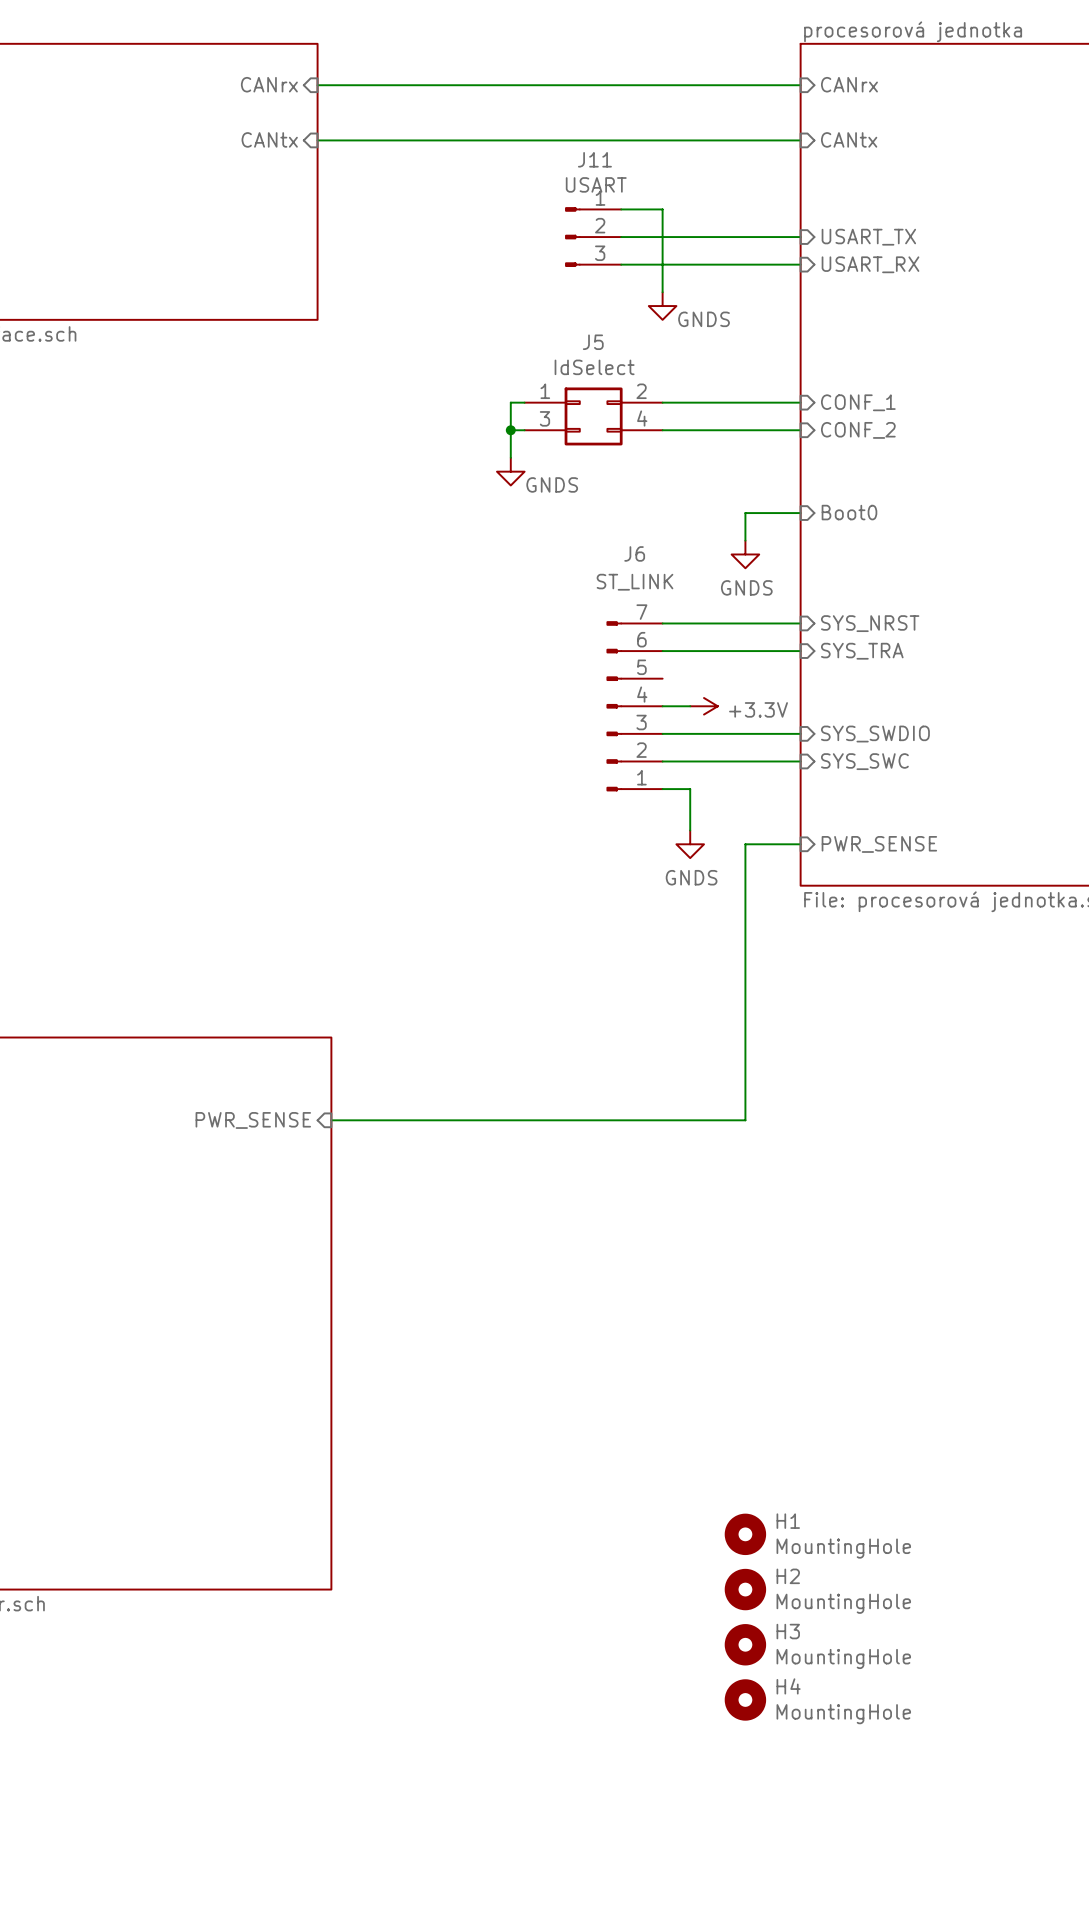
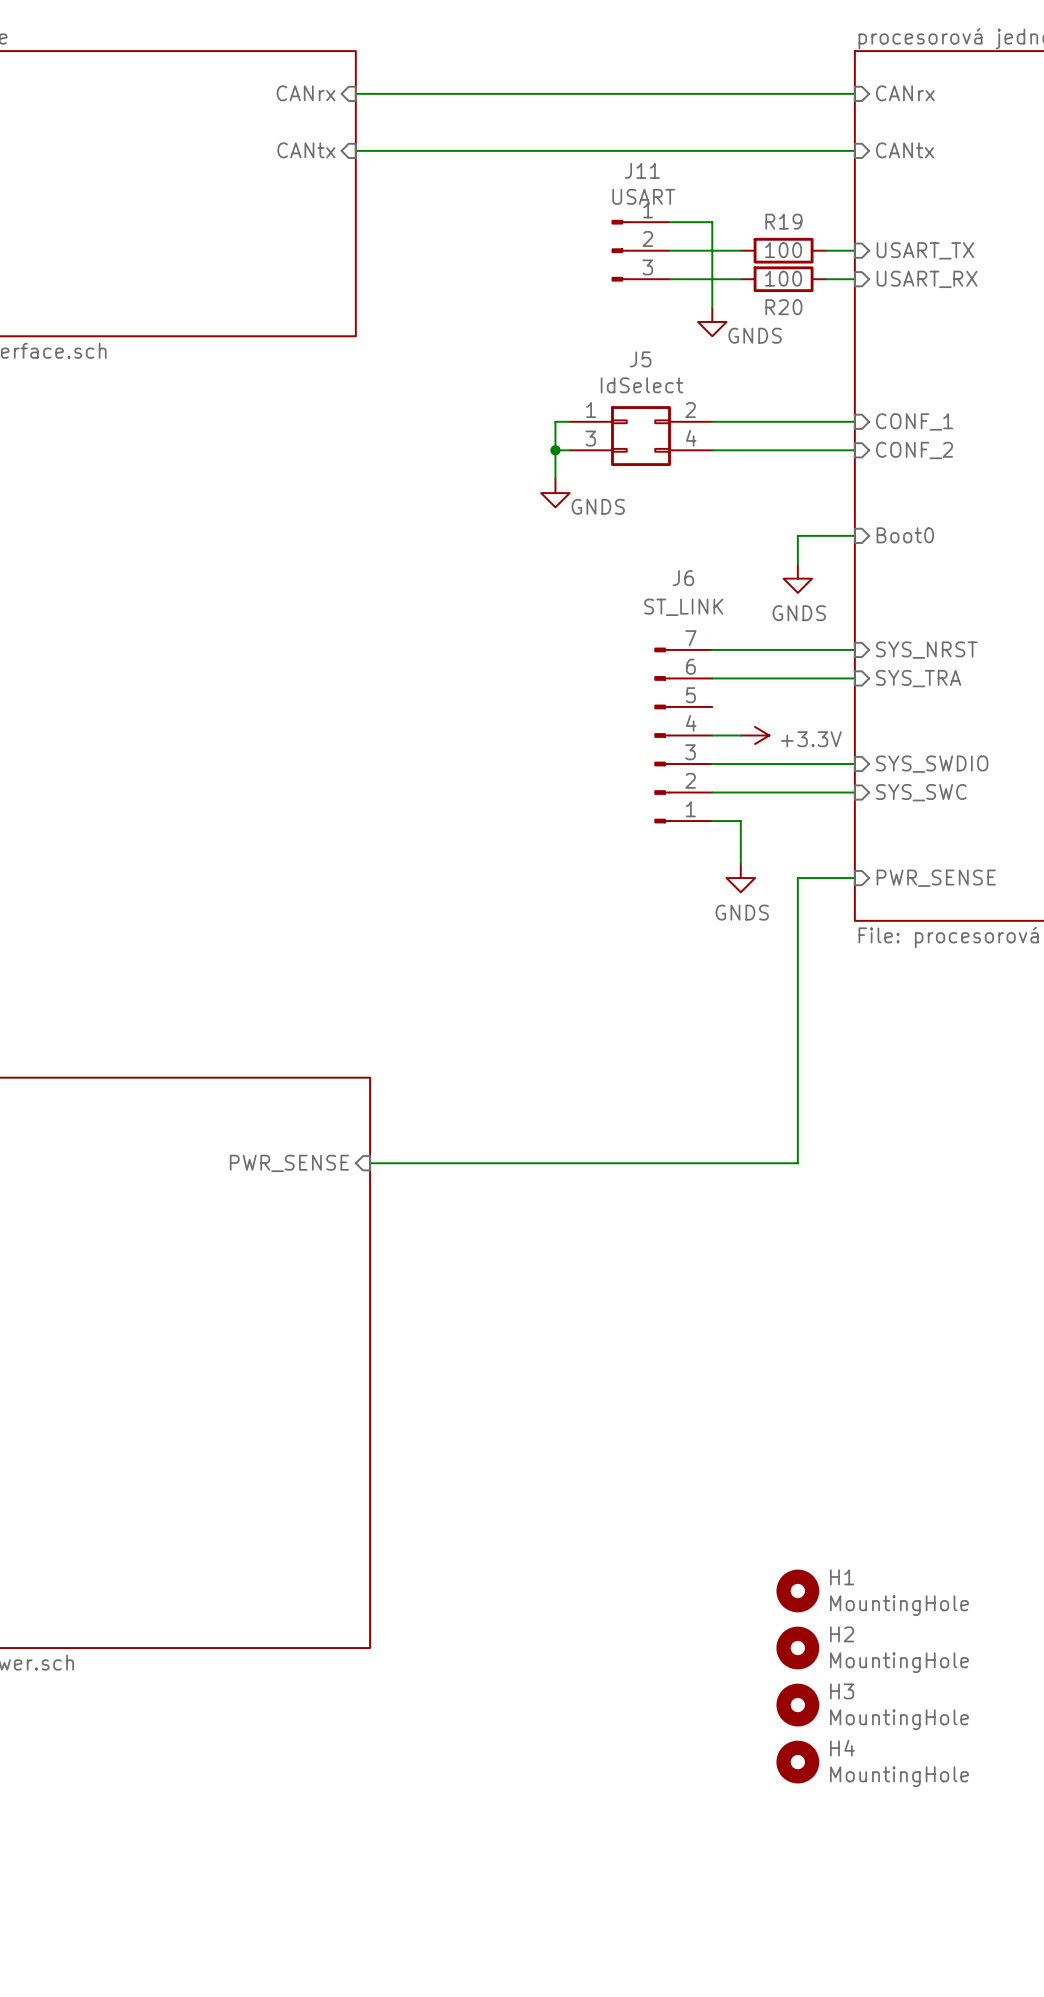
wire: (690, 237) (773, 237) -> none
R19: none -> 100 (783, 250)
wire: (690, 264) (773, 264) -> none
R20: none -> 100 (783, 279)

